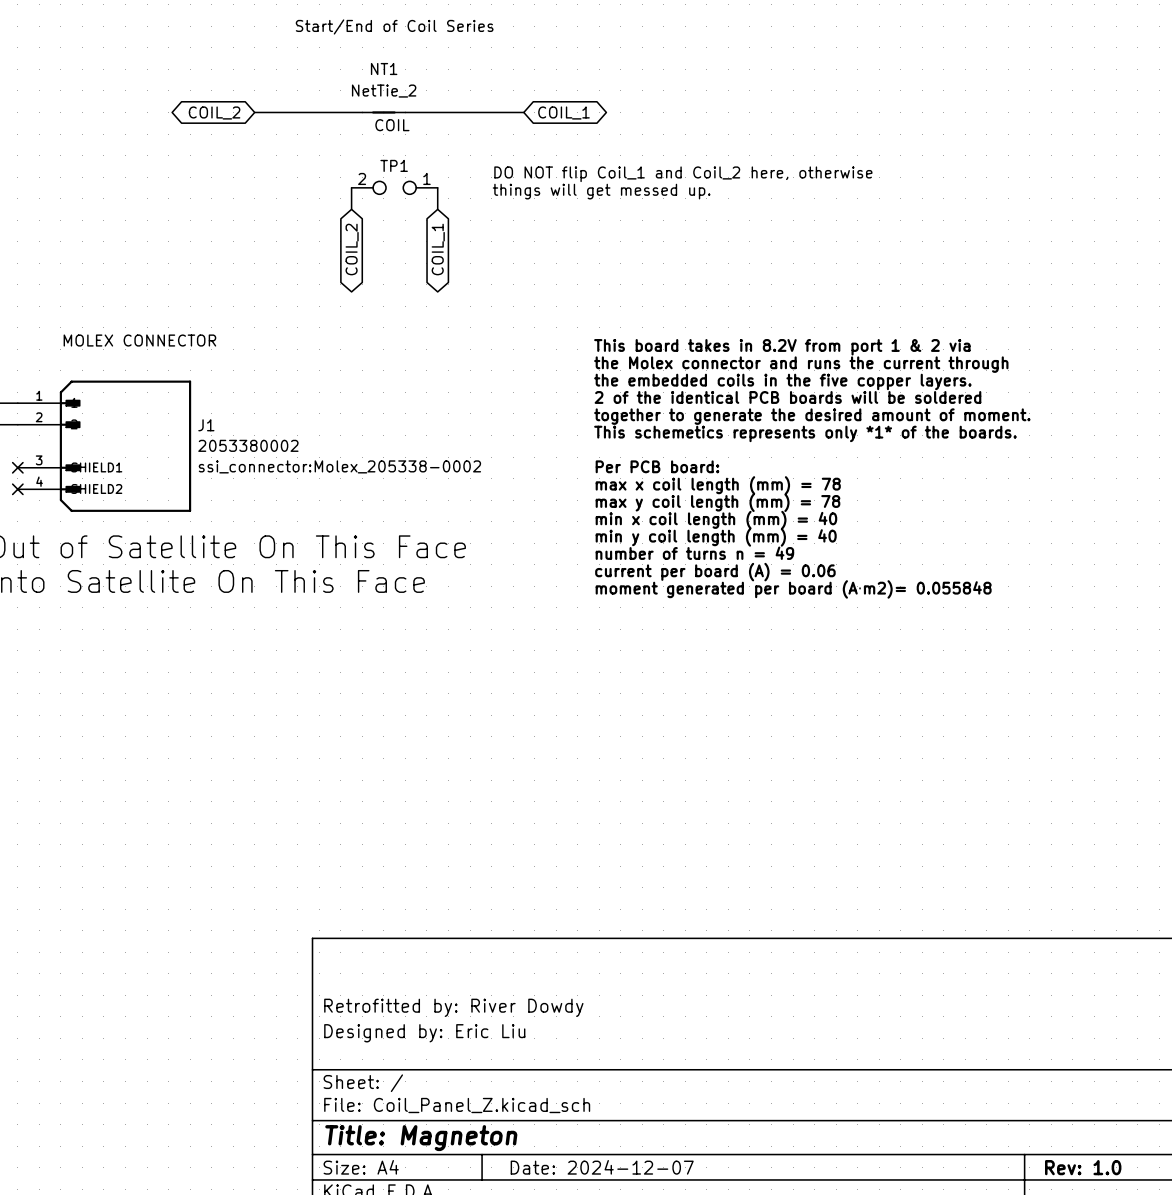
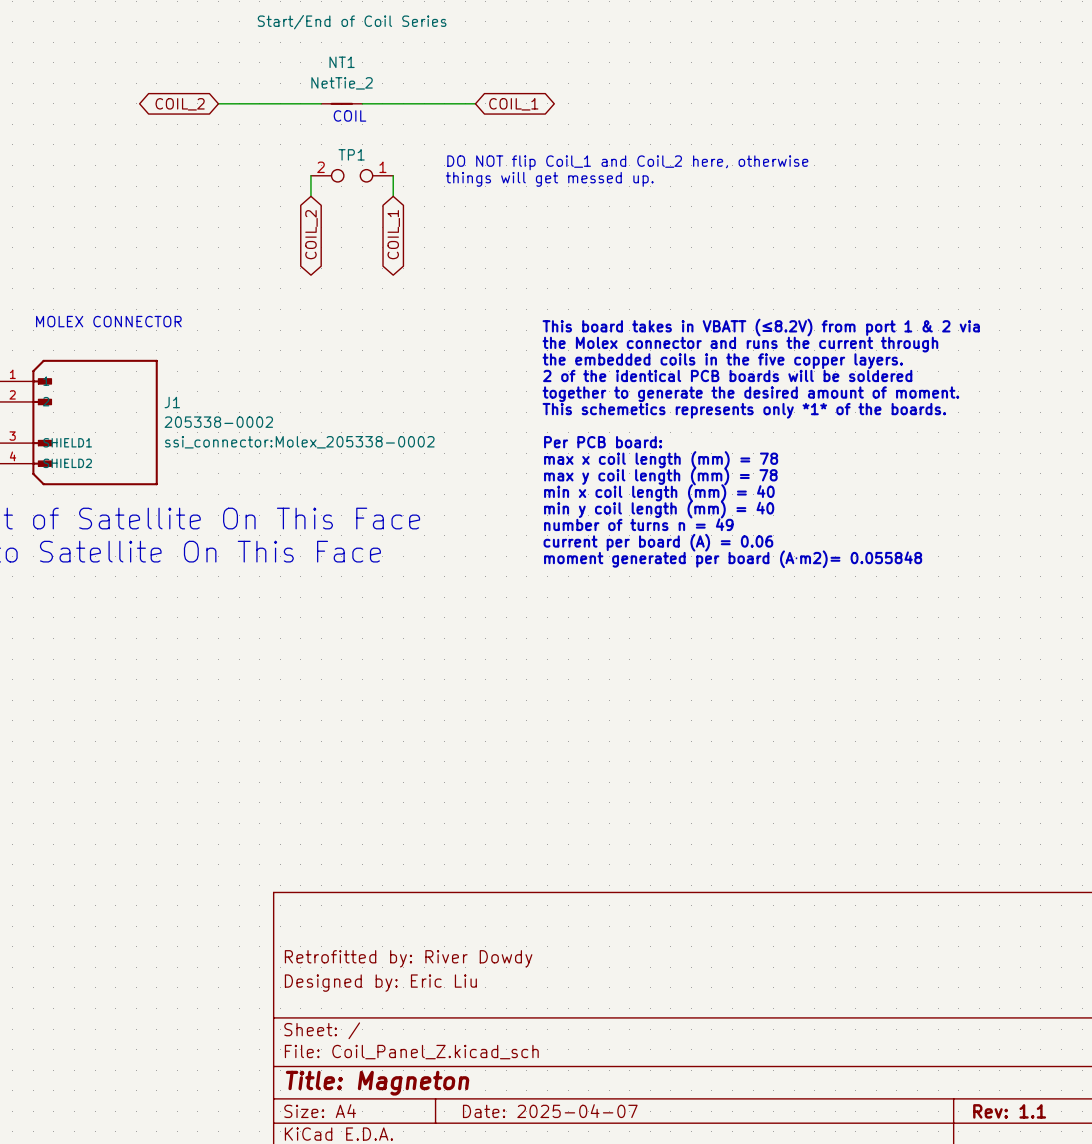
text: This board takes in 8.2V from port 1 & 2 via (782, 347) -> This board takes in VBATT (≤8.2V) from port 1 & 2 via (761, 327)
J1 value: 2053380002 (248, 445) -> 205338-0002 (218, 422)
title block: Date: 2024-12-07 (602, 1167) -> Date: 2025-04-07 (550, 1111)
title block: Rev: 1.0 (1083, 1167) -> Rev: 1.1 (1009, 1111)

